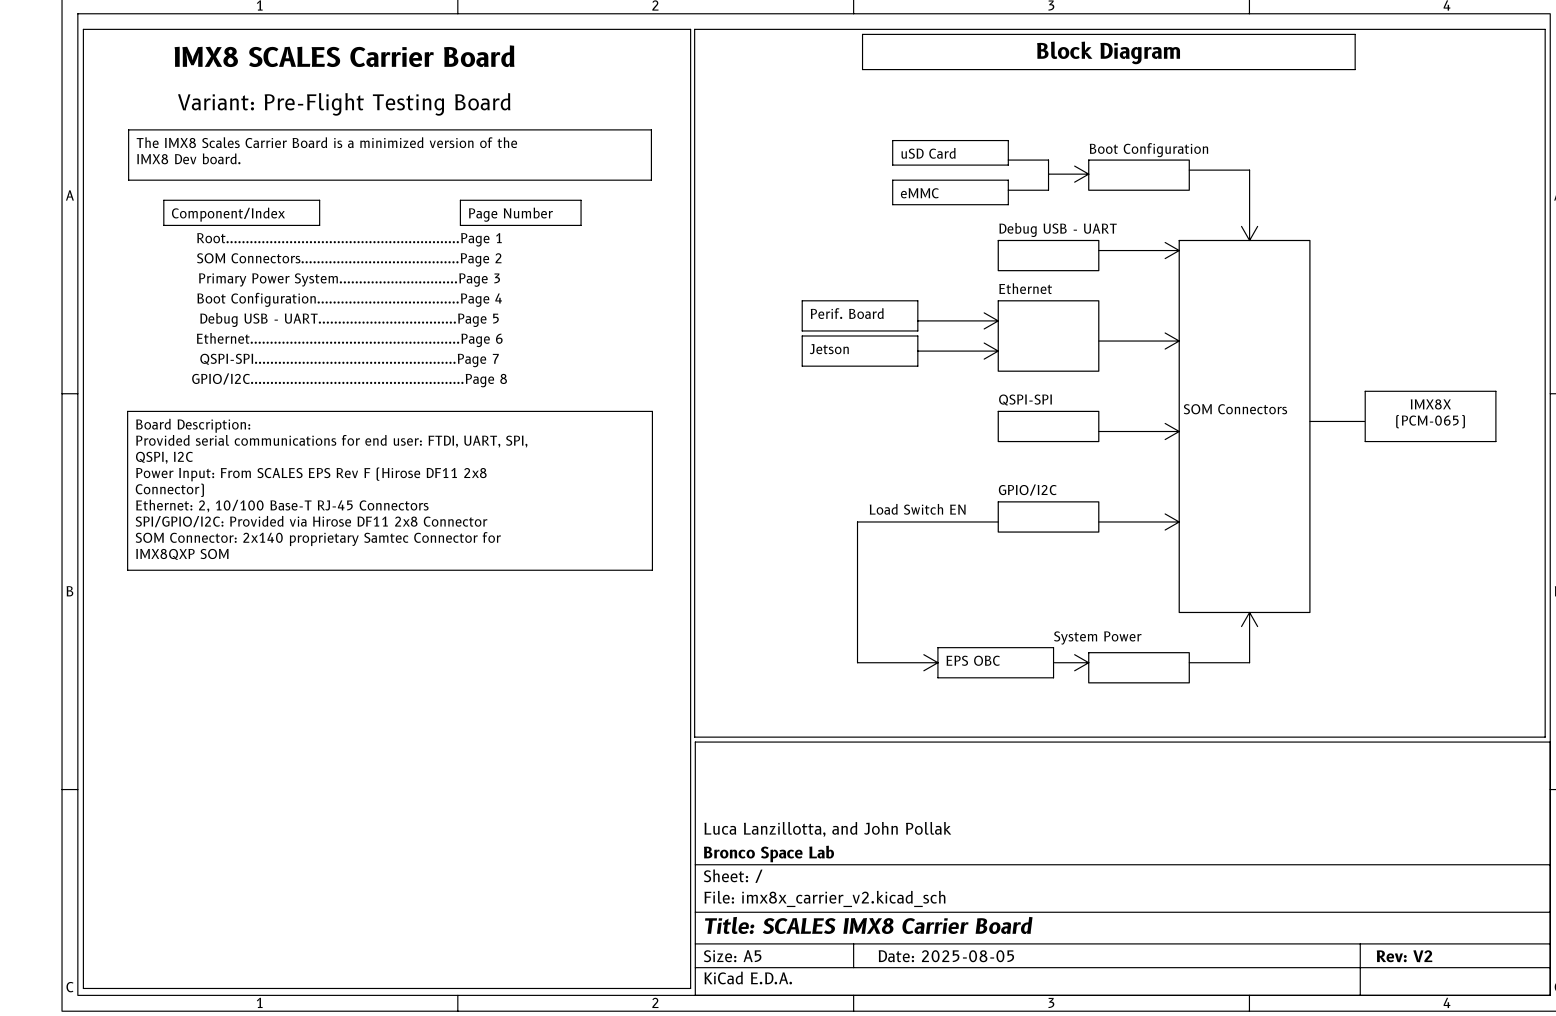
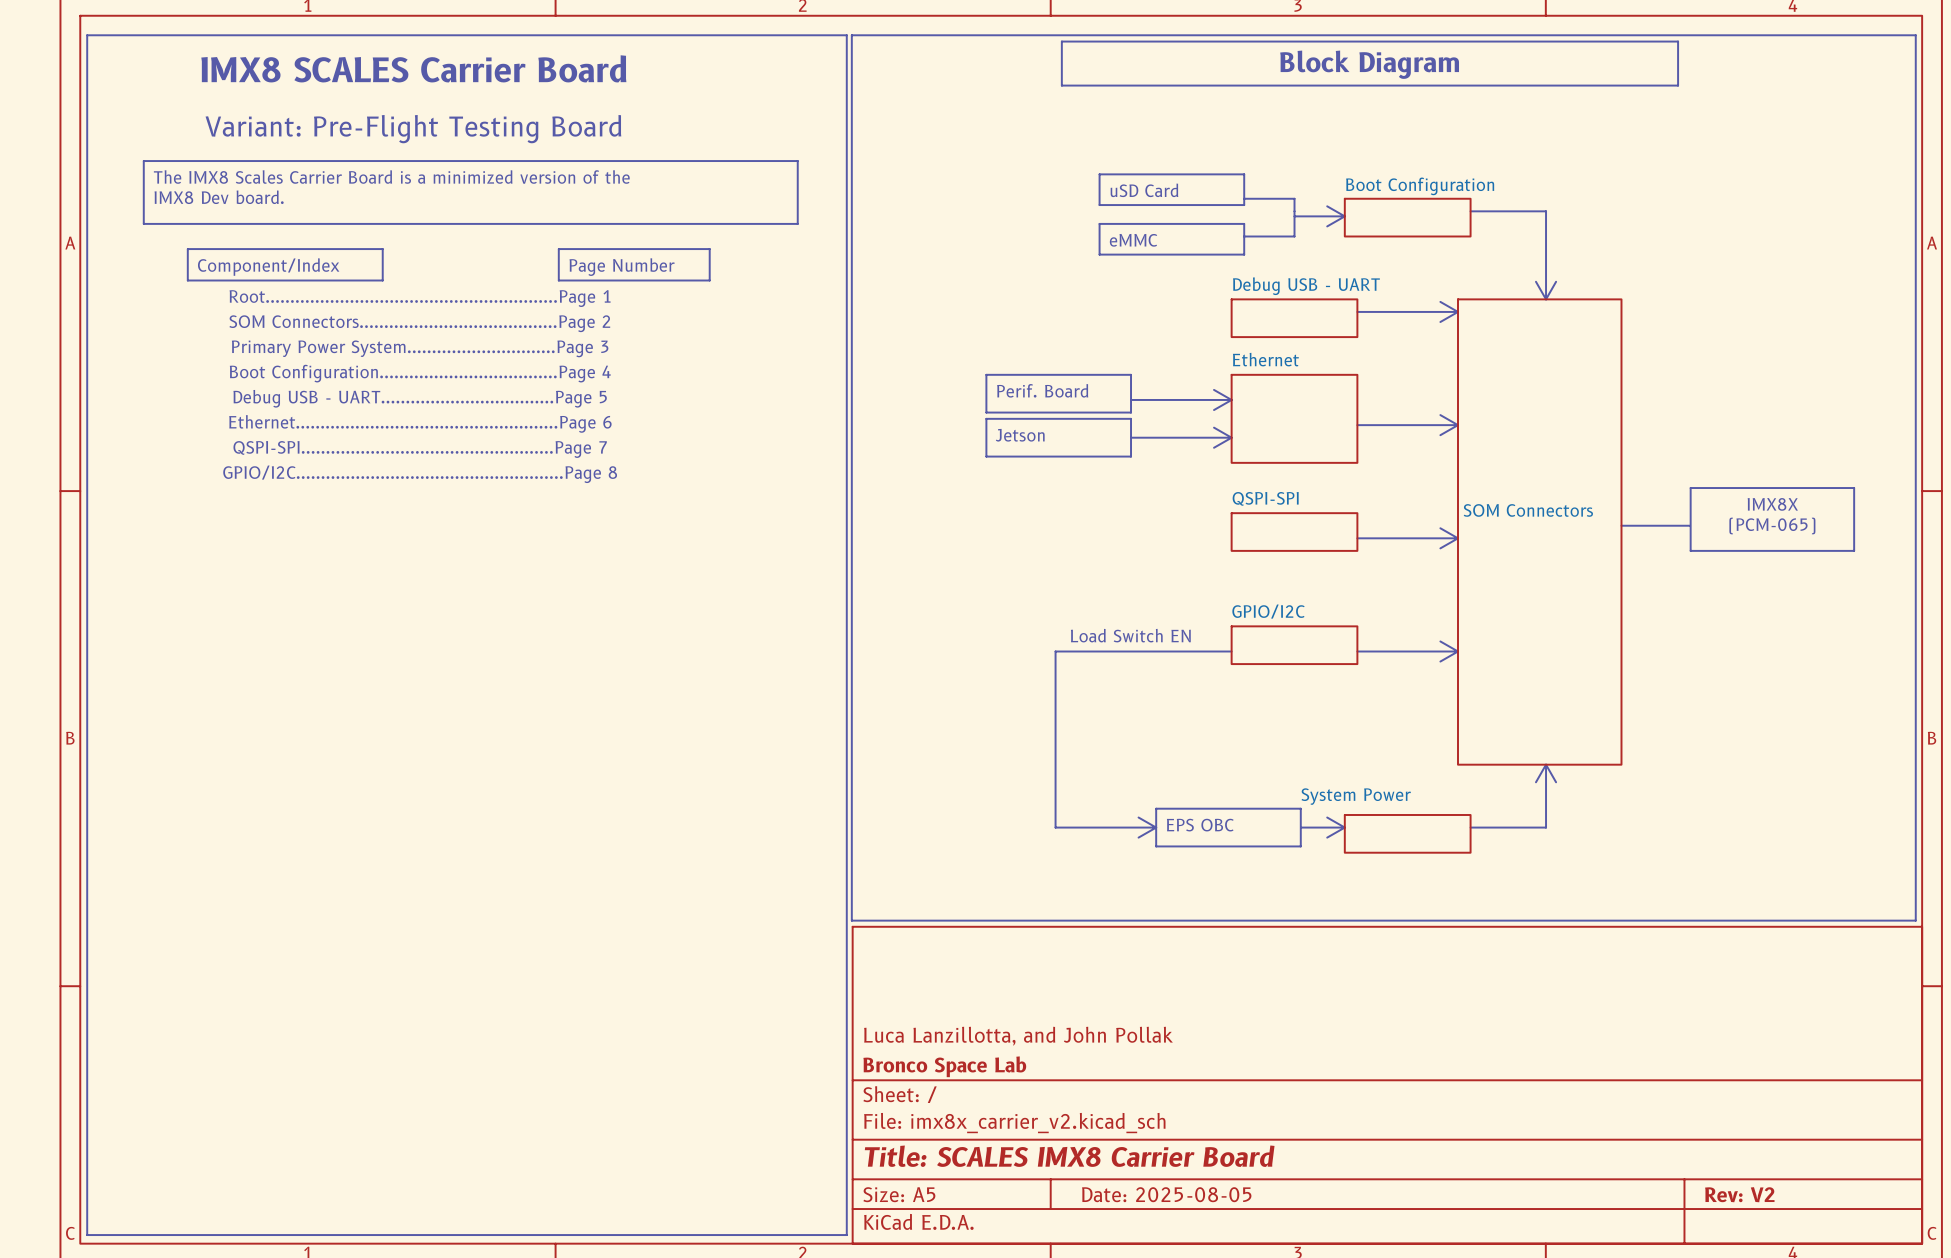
line: (127, 411) (652, 411) (652, 570) (127, 570) (127, 411) -> none
text: Board Description: (193, 425) -> none
text: Provided serial communications for end user: FTDI, UART, SPI, (331, 441) -> none
text: QSPI, I2C (164, 457) -> none
text: Power Input: From SCALES EPS Rev F (Hirose DF11 2x8 (311, 474) -> none
text: Connector) (169, 490) -> none
text: Ethernet: 2, 10/100 Base-T RJ-45 Connectors (282, 506) -> none
text: SPI/GPIO/I2C: Provided via Hirose DF11 2x8 Connector (311, 521) -> none
text: SOM Connector: 2x140 proprietary Samtec Connector for (318, 539) -> none
text: IMX8QXP SOM (182, 554) -> none

